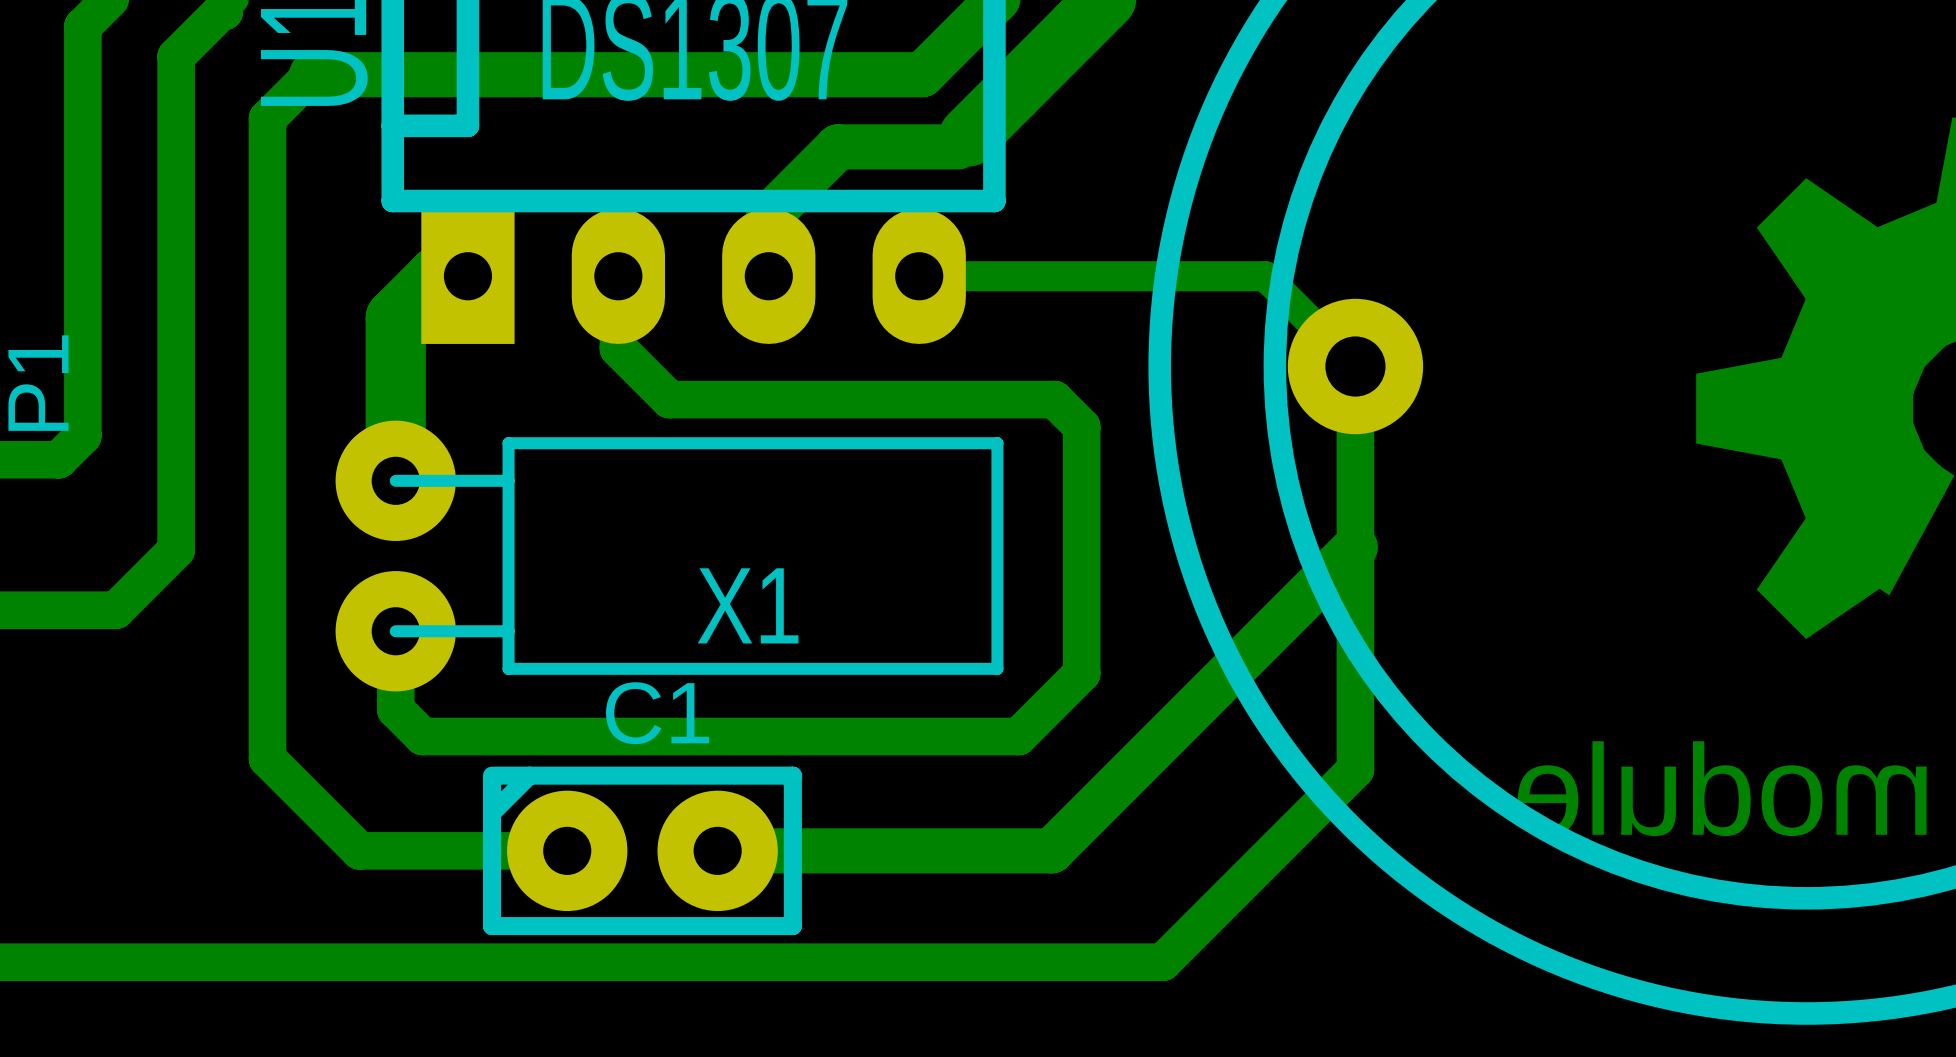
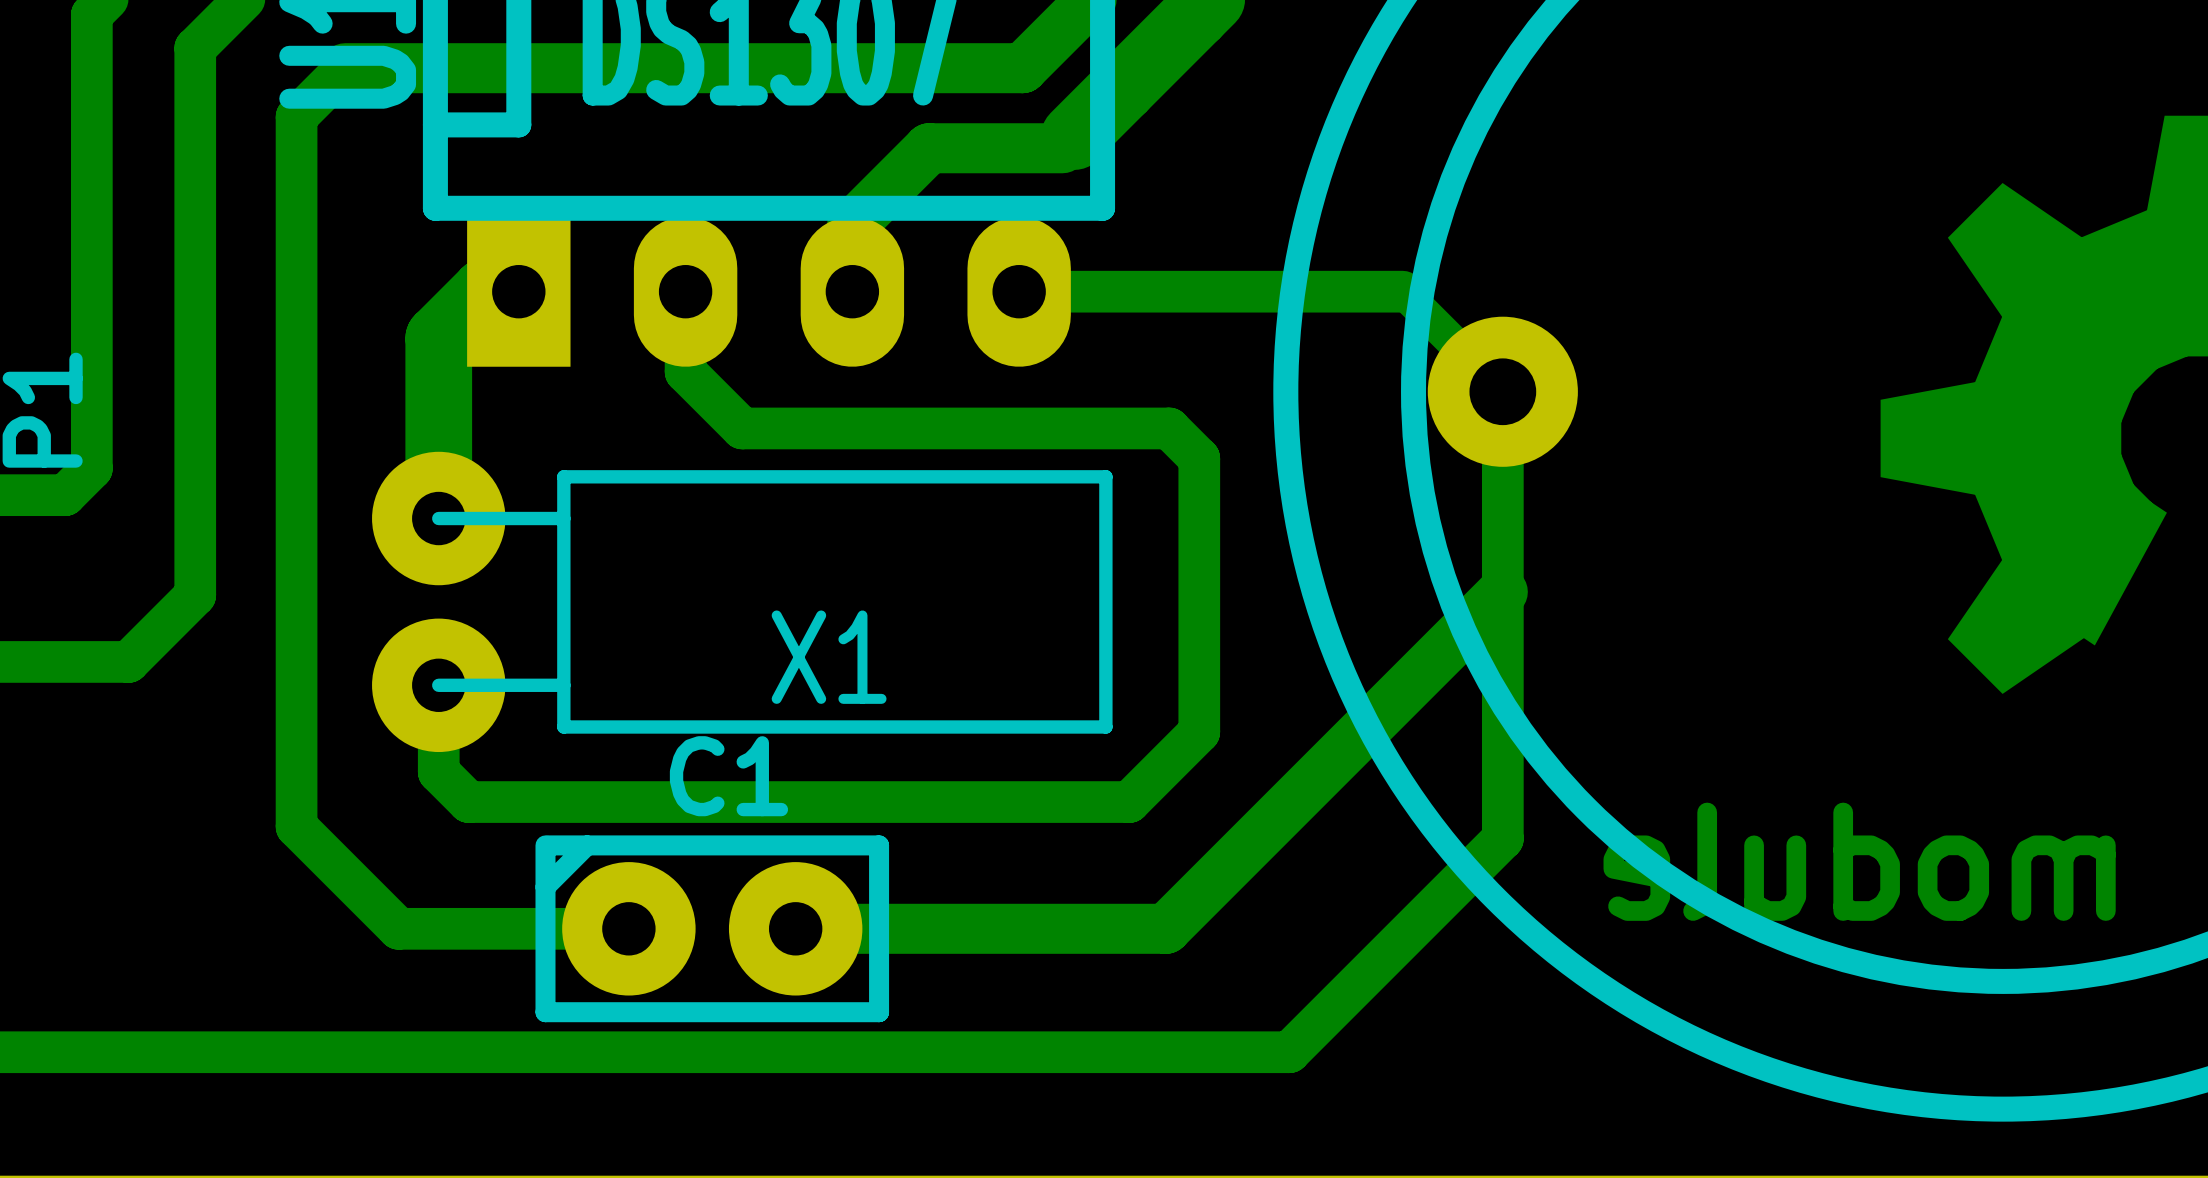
bottom track width: thin (919, 276) (1265, 276) -> thick (1019, 291) (1402, 291)

